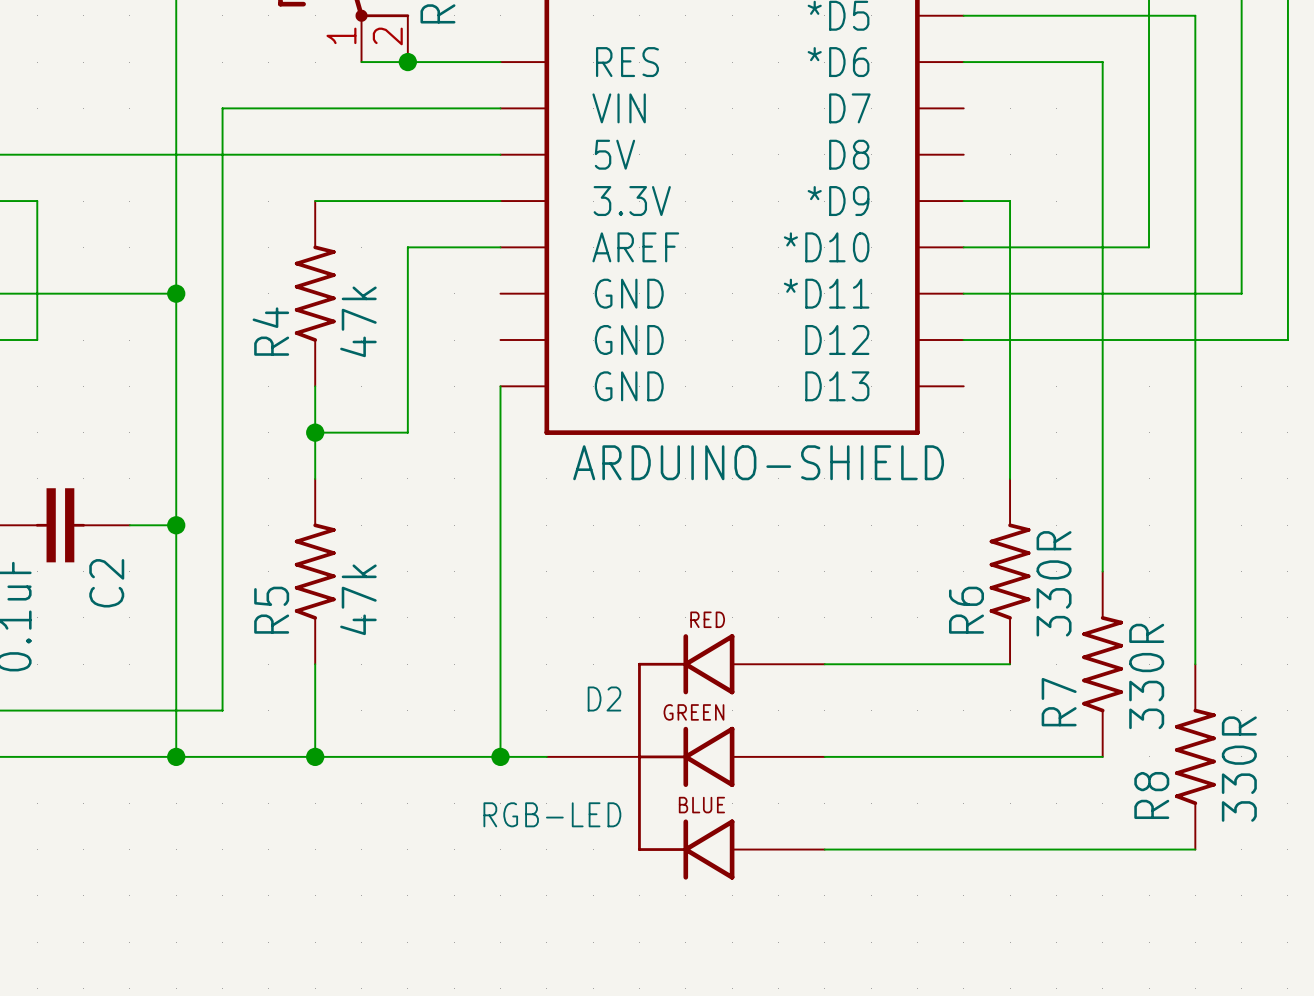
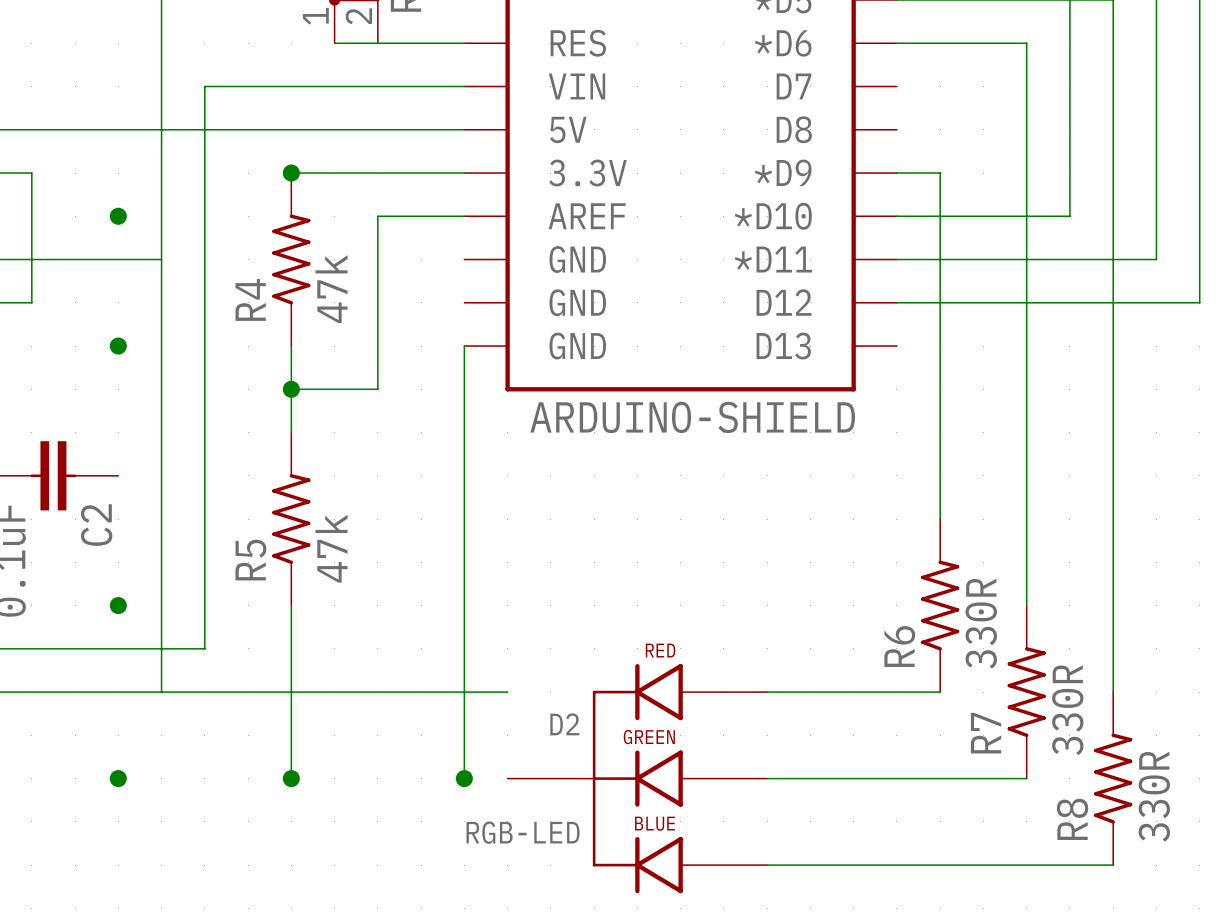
junction: (407, 62) -> none
junction: none -> (291, 173)
junction: none -> (118, 216)
junction: (176, 293) -> none
junction: none -> (118, 346)
wire: (129, 525) (176, 525) -> none
junction: (176, 525) -> none
R6 position: (1010, 571) -> (940, 605)
junction: none -> (118, 605)
wire: (824, 664) (1010, 664) -> none
R7 position: (1102, 664) -> (1026, 692)
junction: (176, 756) -> none
wire: none -> (291, 692) (291, 778)
junction: (315, 756) -> none
wire: none -> (464, 692) (464, 778)
junction position: (500, 756) -> (464, 778)
D2 position: (685, 756) -> (637, 778)
wire: (1010, 756) (1102, 756) -> none
R8 position: (1195, 756) -> (1113, 778)
junction: none -> (118, 778)
junction: none -> (291, 778)
wire: (1102, 849) (1195, 849) -> none
wire: none -> (767, 865) (1113, 865)

